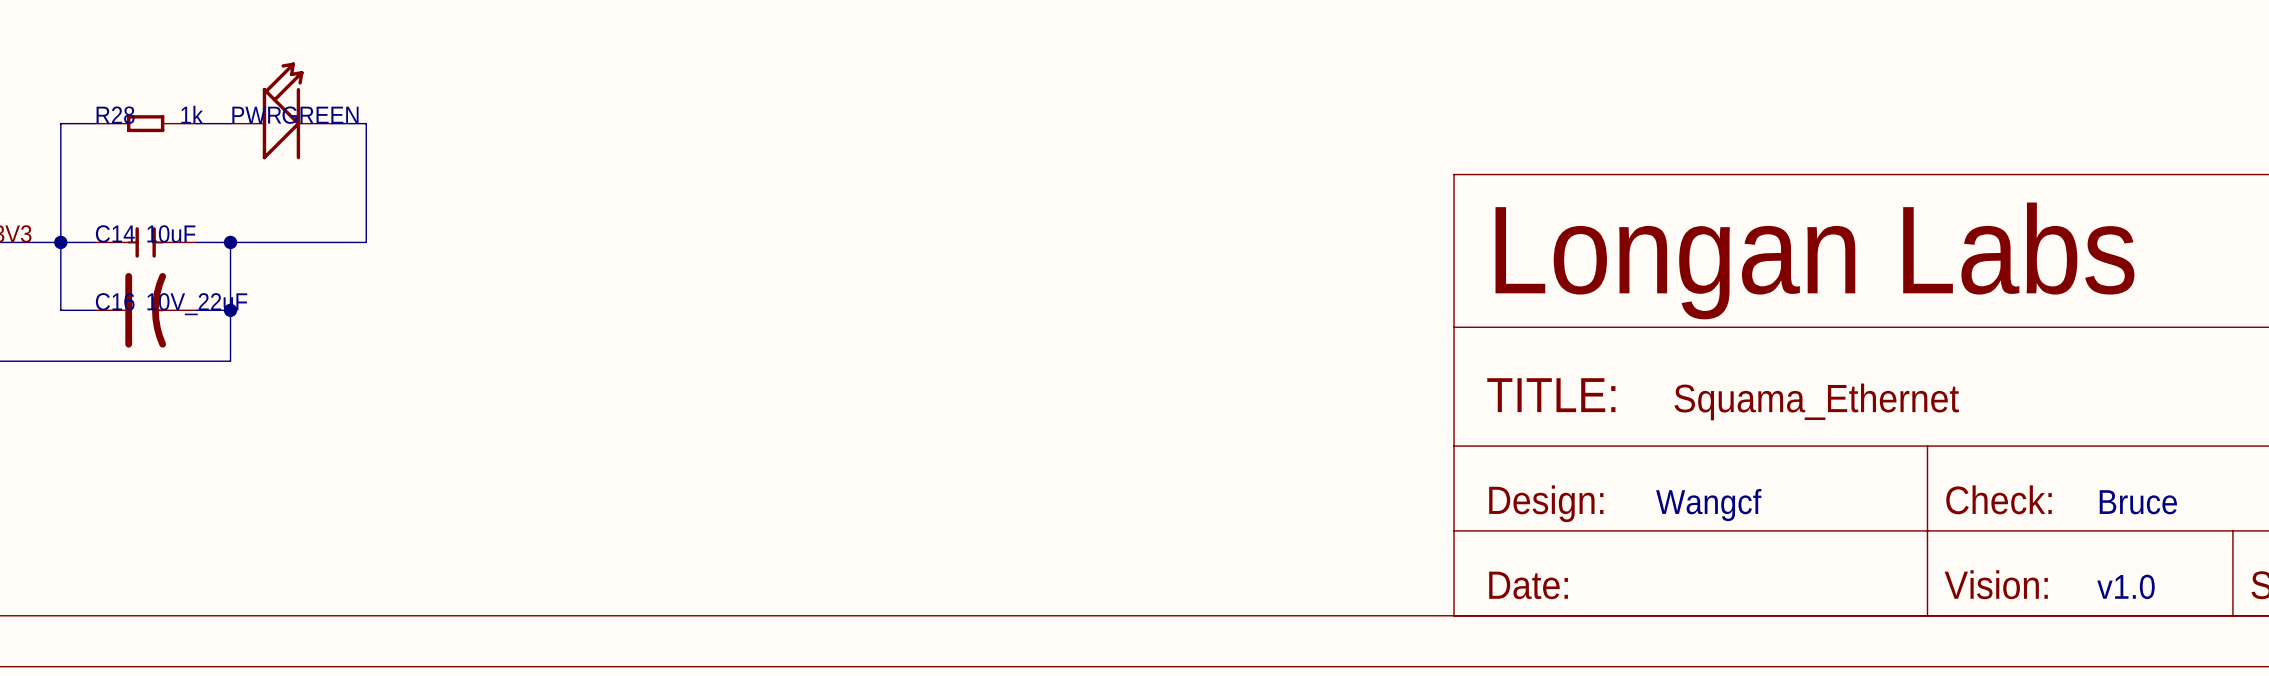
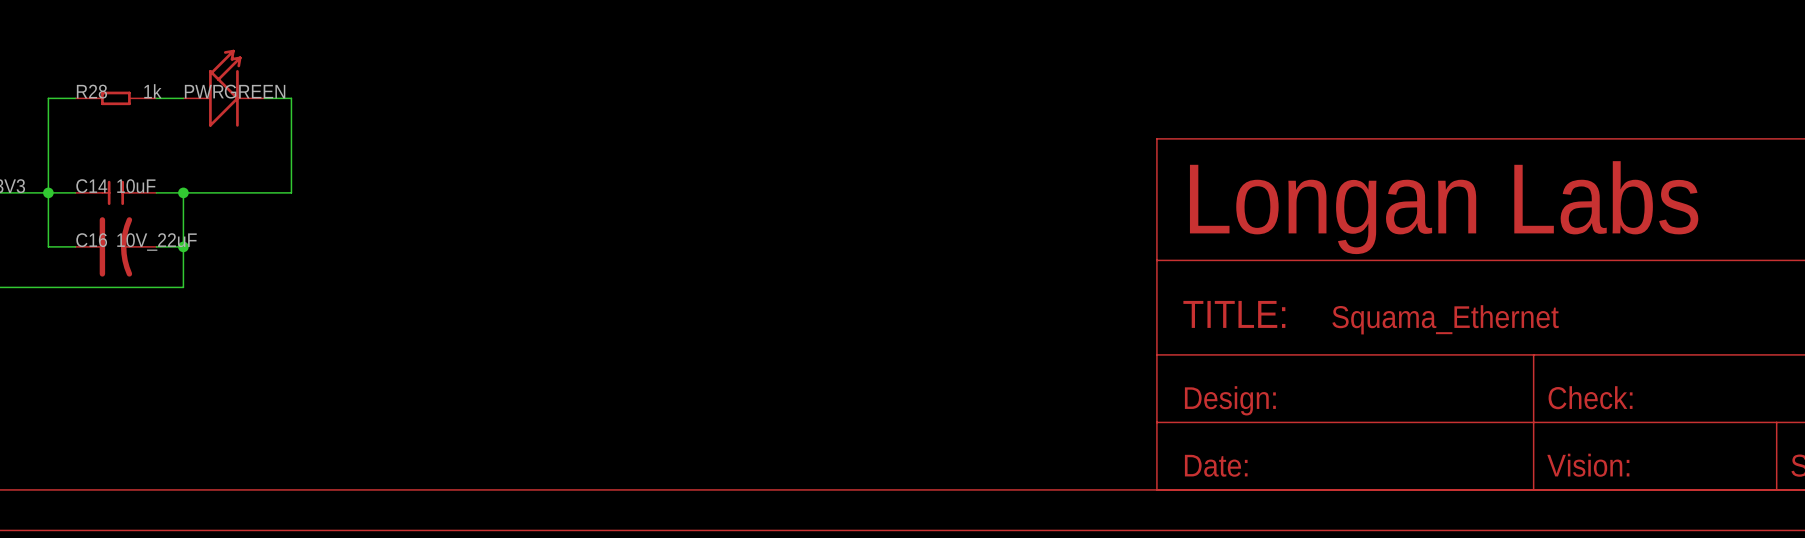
text: Bruce (2138, 502) -> none
text: Wangcf (1708, 505) -> none
text: v1.0 (2126, 586) -> none

